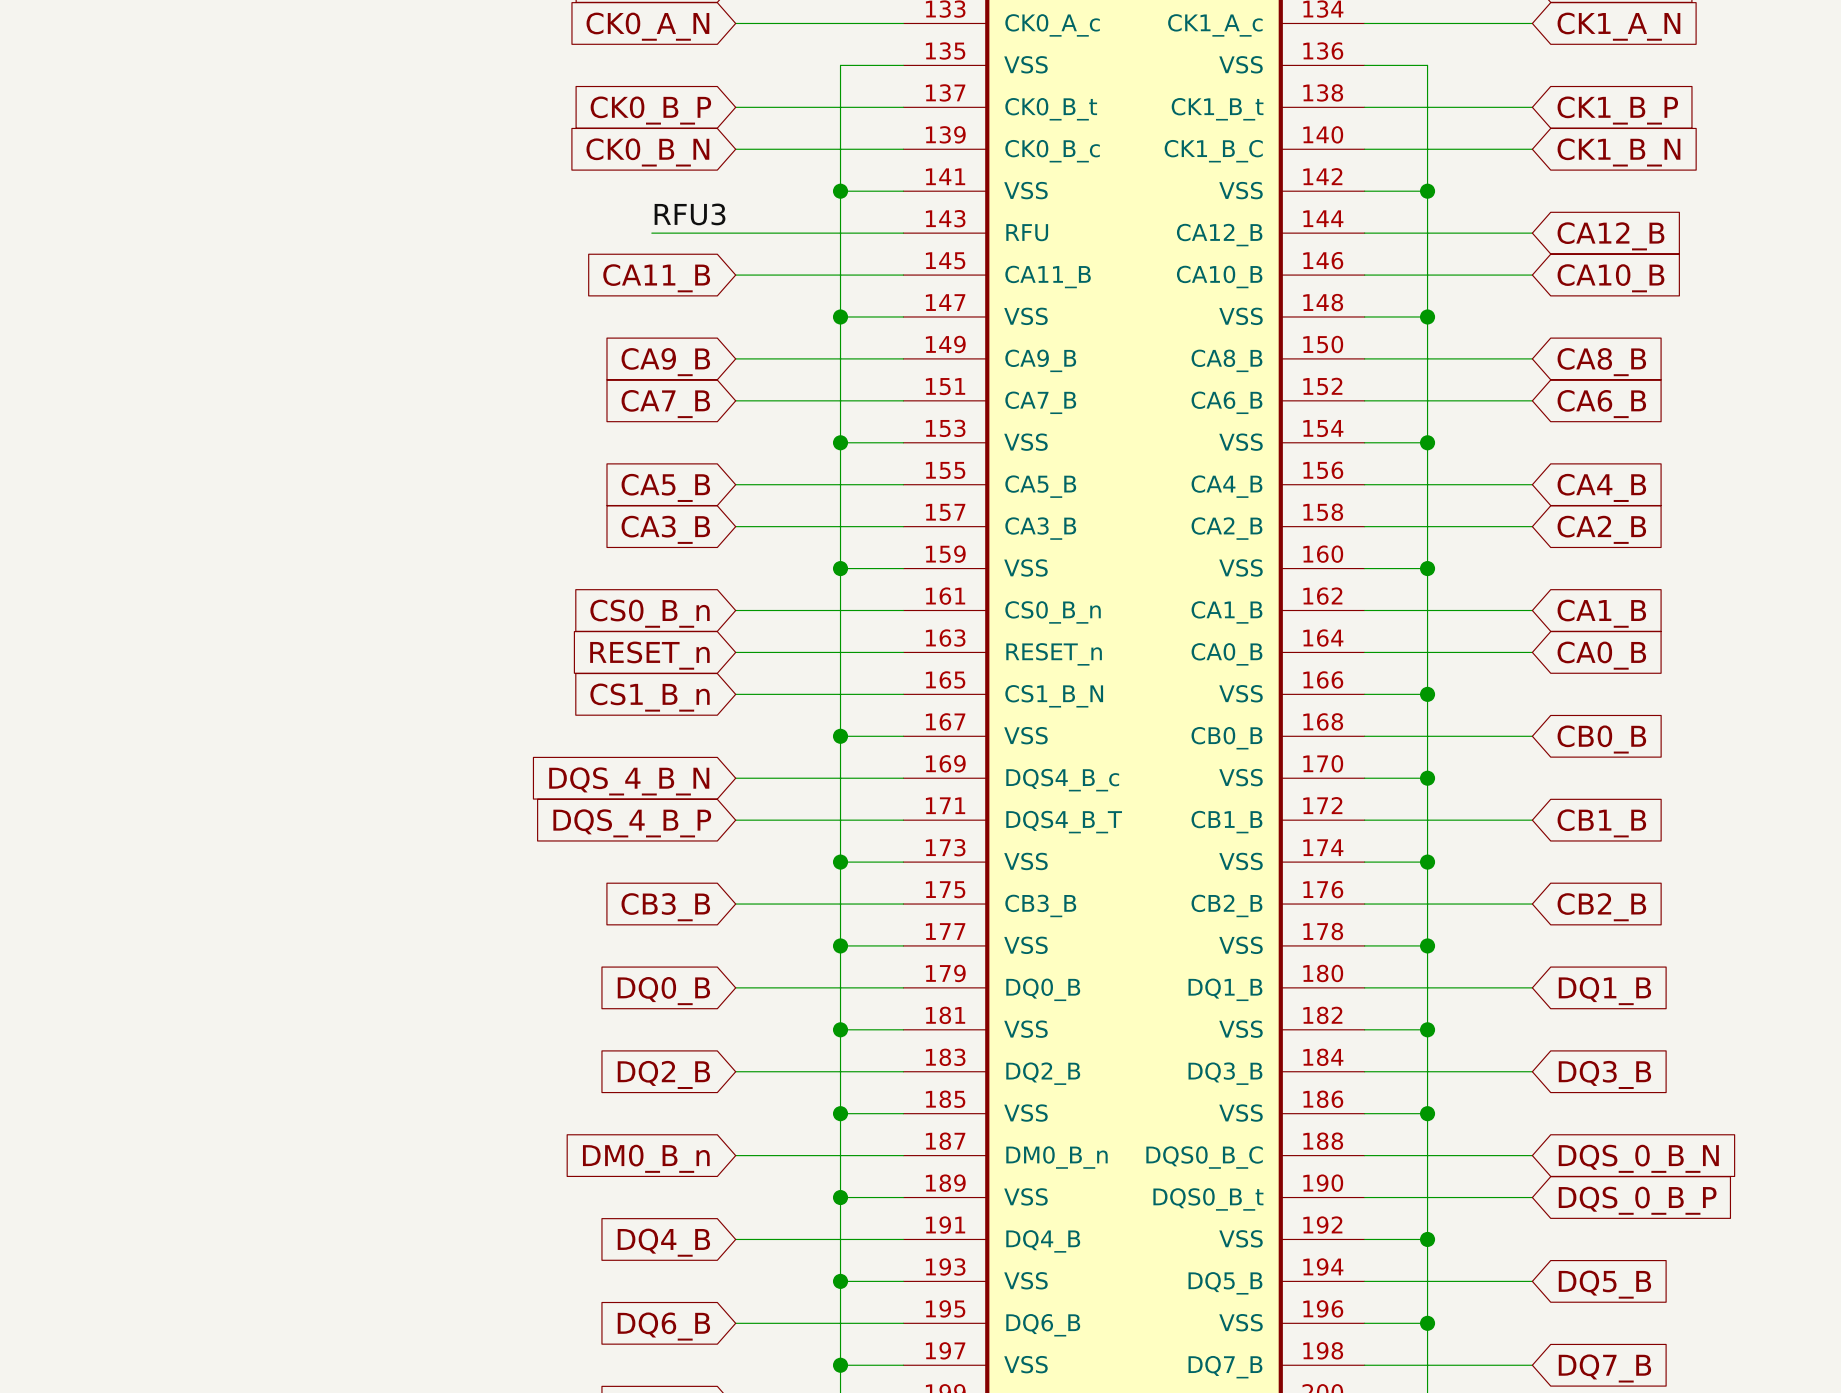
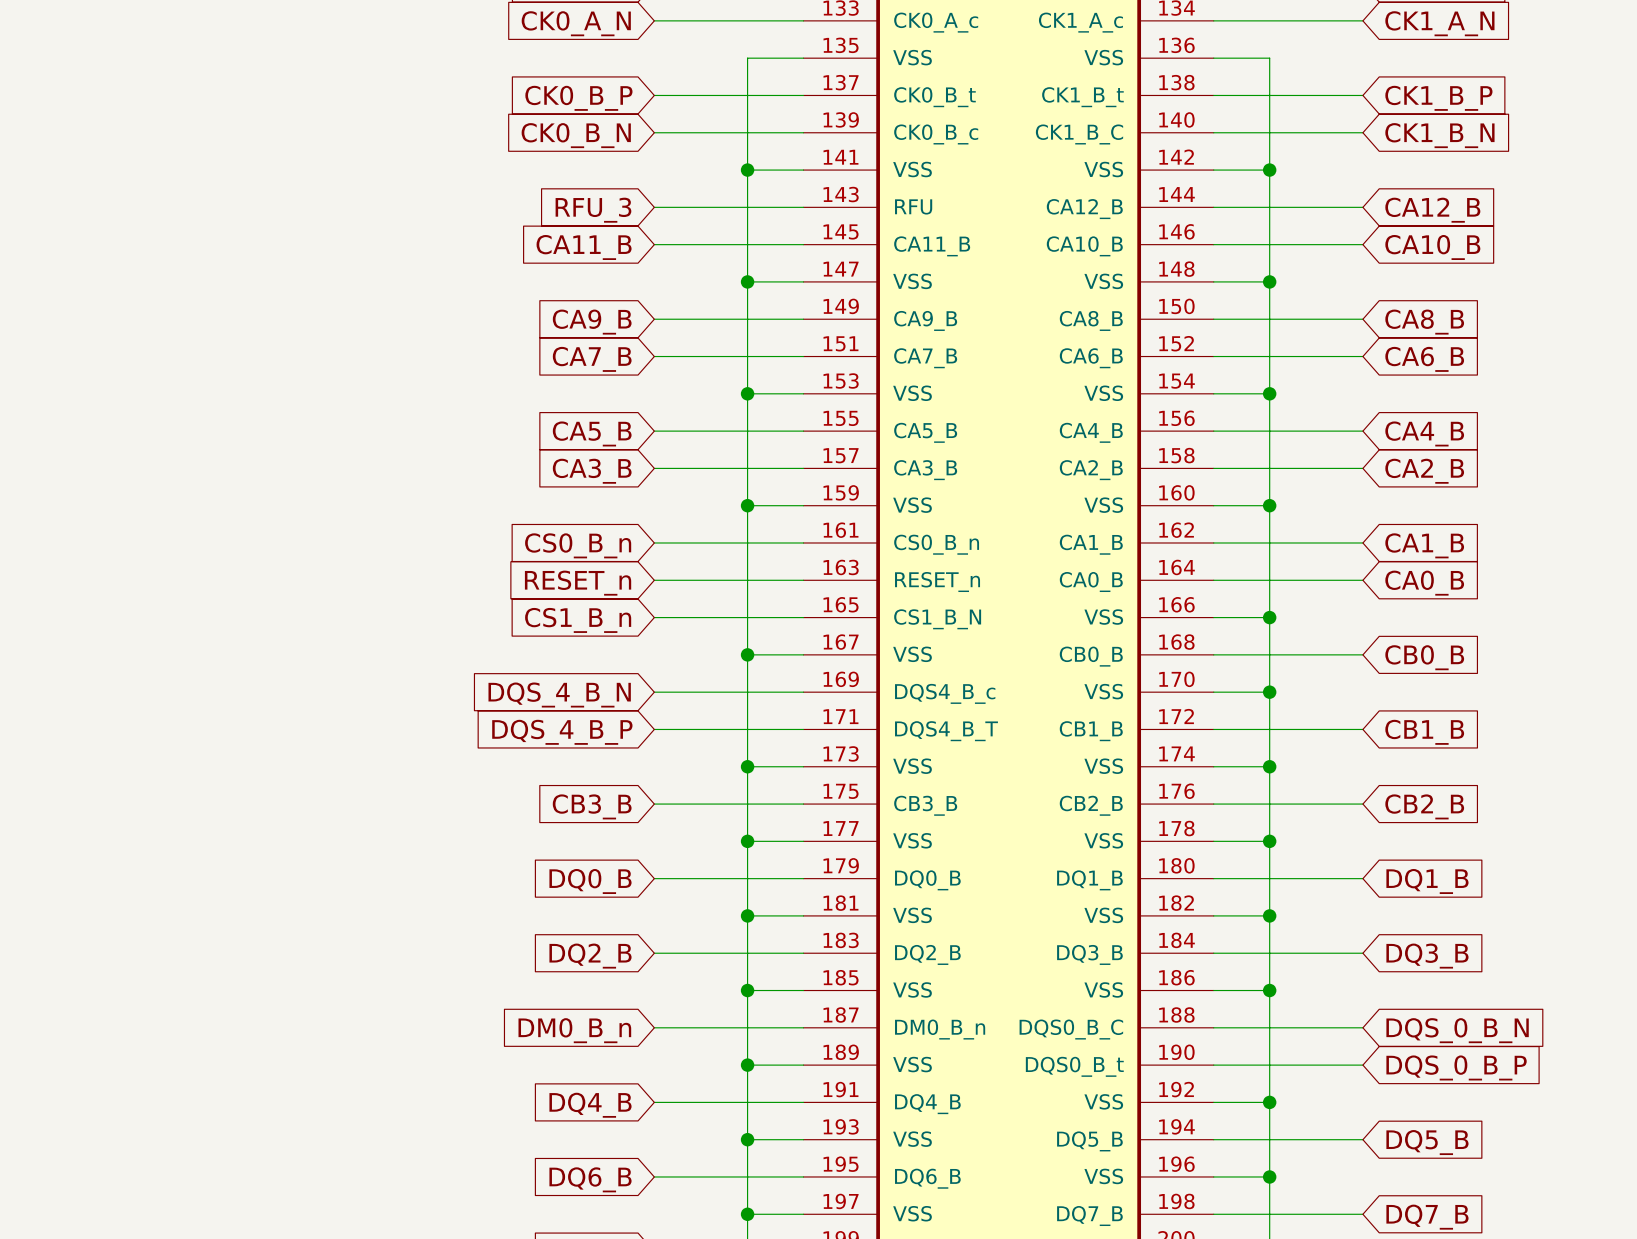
label: RFU3 (690, 214) -> none
wire: (651, 233) (735, 233) -> none
global label: none -> RFU_3 (593, 210)

